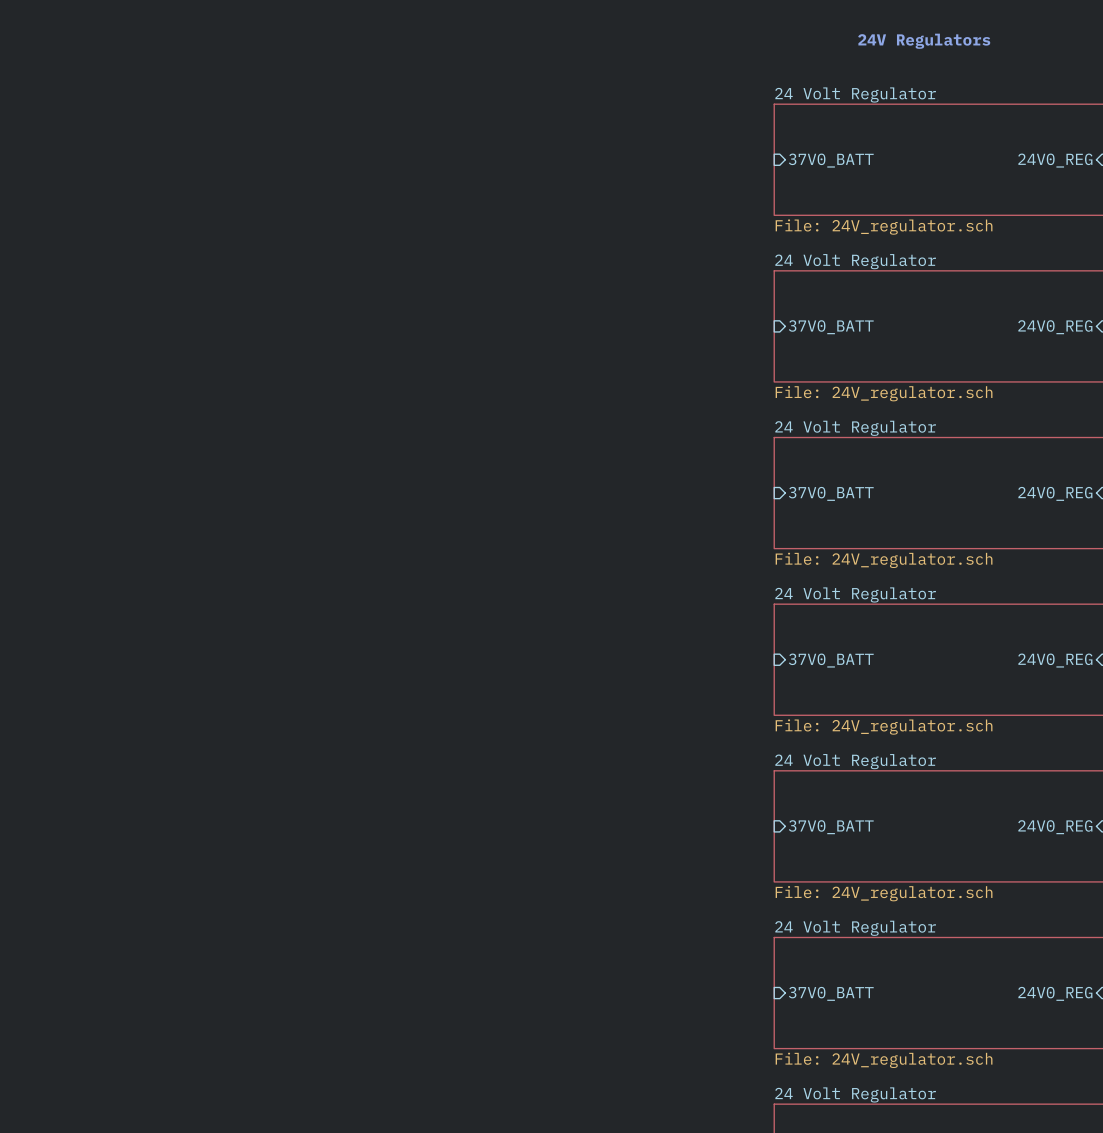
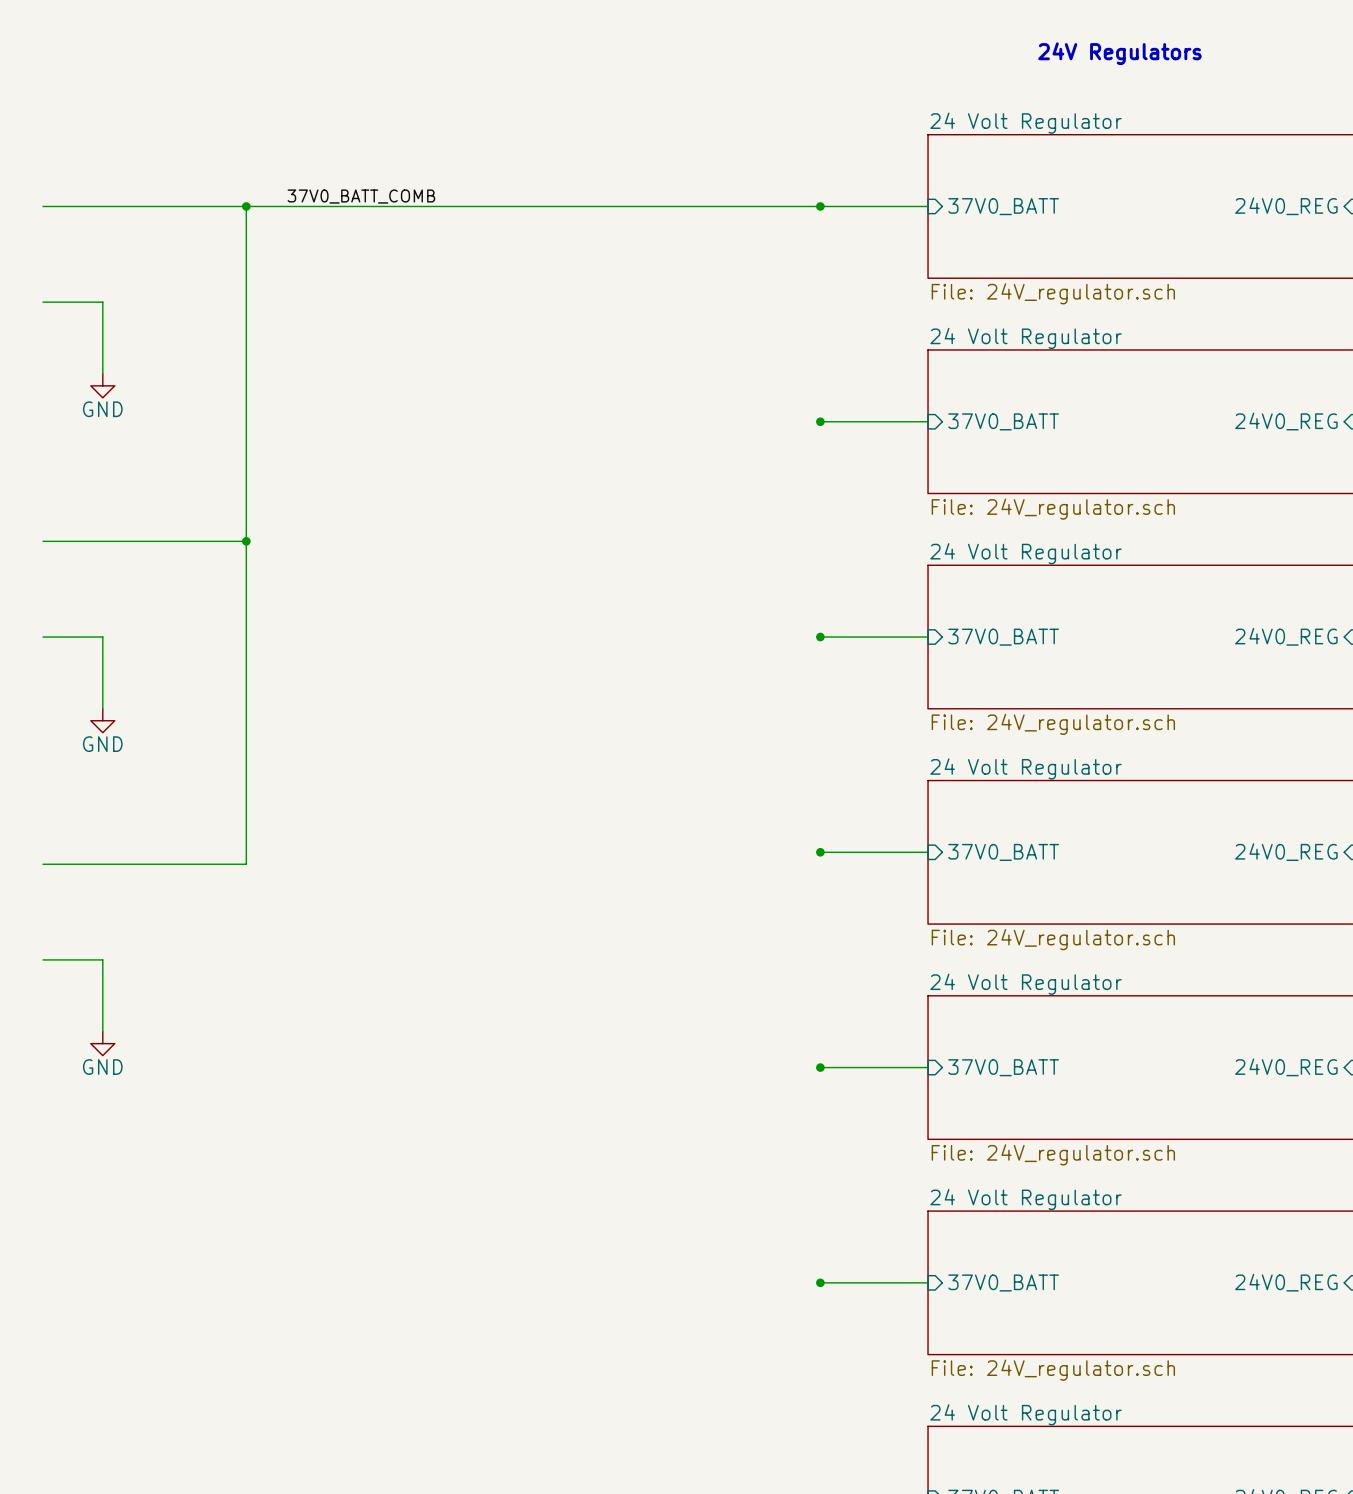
label: none -> 37V0_BATT_COMB (361, 196)
wire: none -> (43, 206) (928, 206)
wire: none -> (246, 206) (246, 864) (43, 864)
junction: none -> (246, 206)
junction: none -> (820, 206)
wire: none -> (43, 302) (102, 302) (102, 373)
power symbol: none -> GND (102, 385)
wire: none -> (820, 421) (928, 421)
junction: none -> (820, 421)
wire: none -> (43, 541) (246, 541)
junction: none -> (246, 541)
wire: none -> (43, 637) (102, 637) (102, 708)
wire: none -> (820, 637) (928, 637)
junction: none -> (820, 637)
power symbol: none -> GND (102, 720)
wire: none -> (820, 852) (928, 852)
junction: none -> (820, 852)
wire: none -> (43, 959) (102, 959) (102, 1031)
power symbol: none -> GND (102, 1043)
wire: none -> (820, 1067) (928, 1067)
junction: none -> (820, 1067)
wire: none -> (820, 1282) (928, 1282)
junction: none -> (820, 1282)

